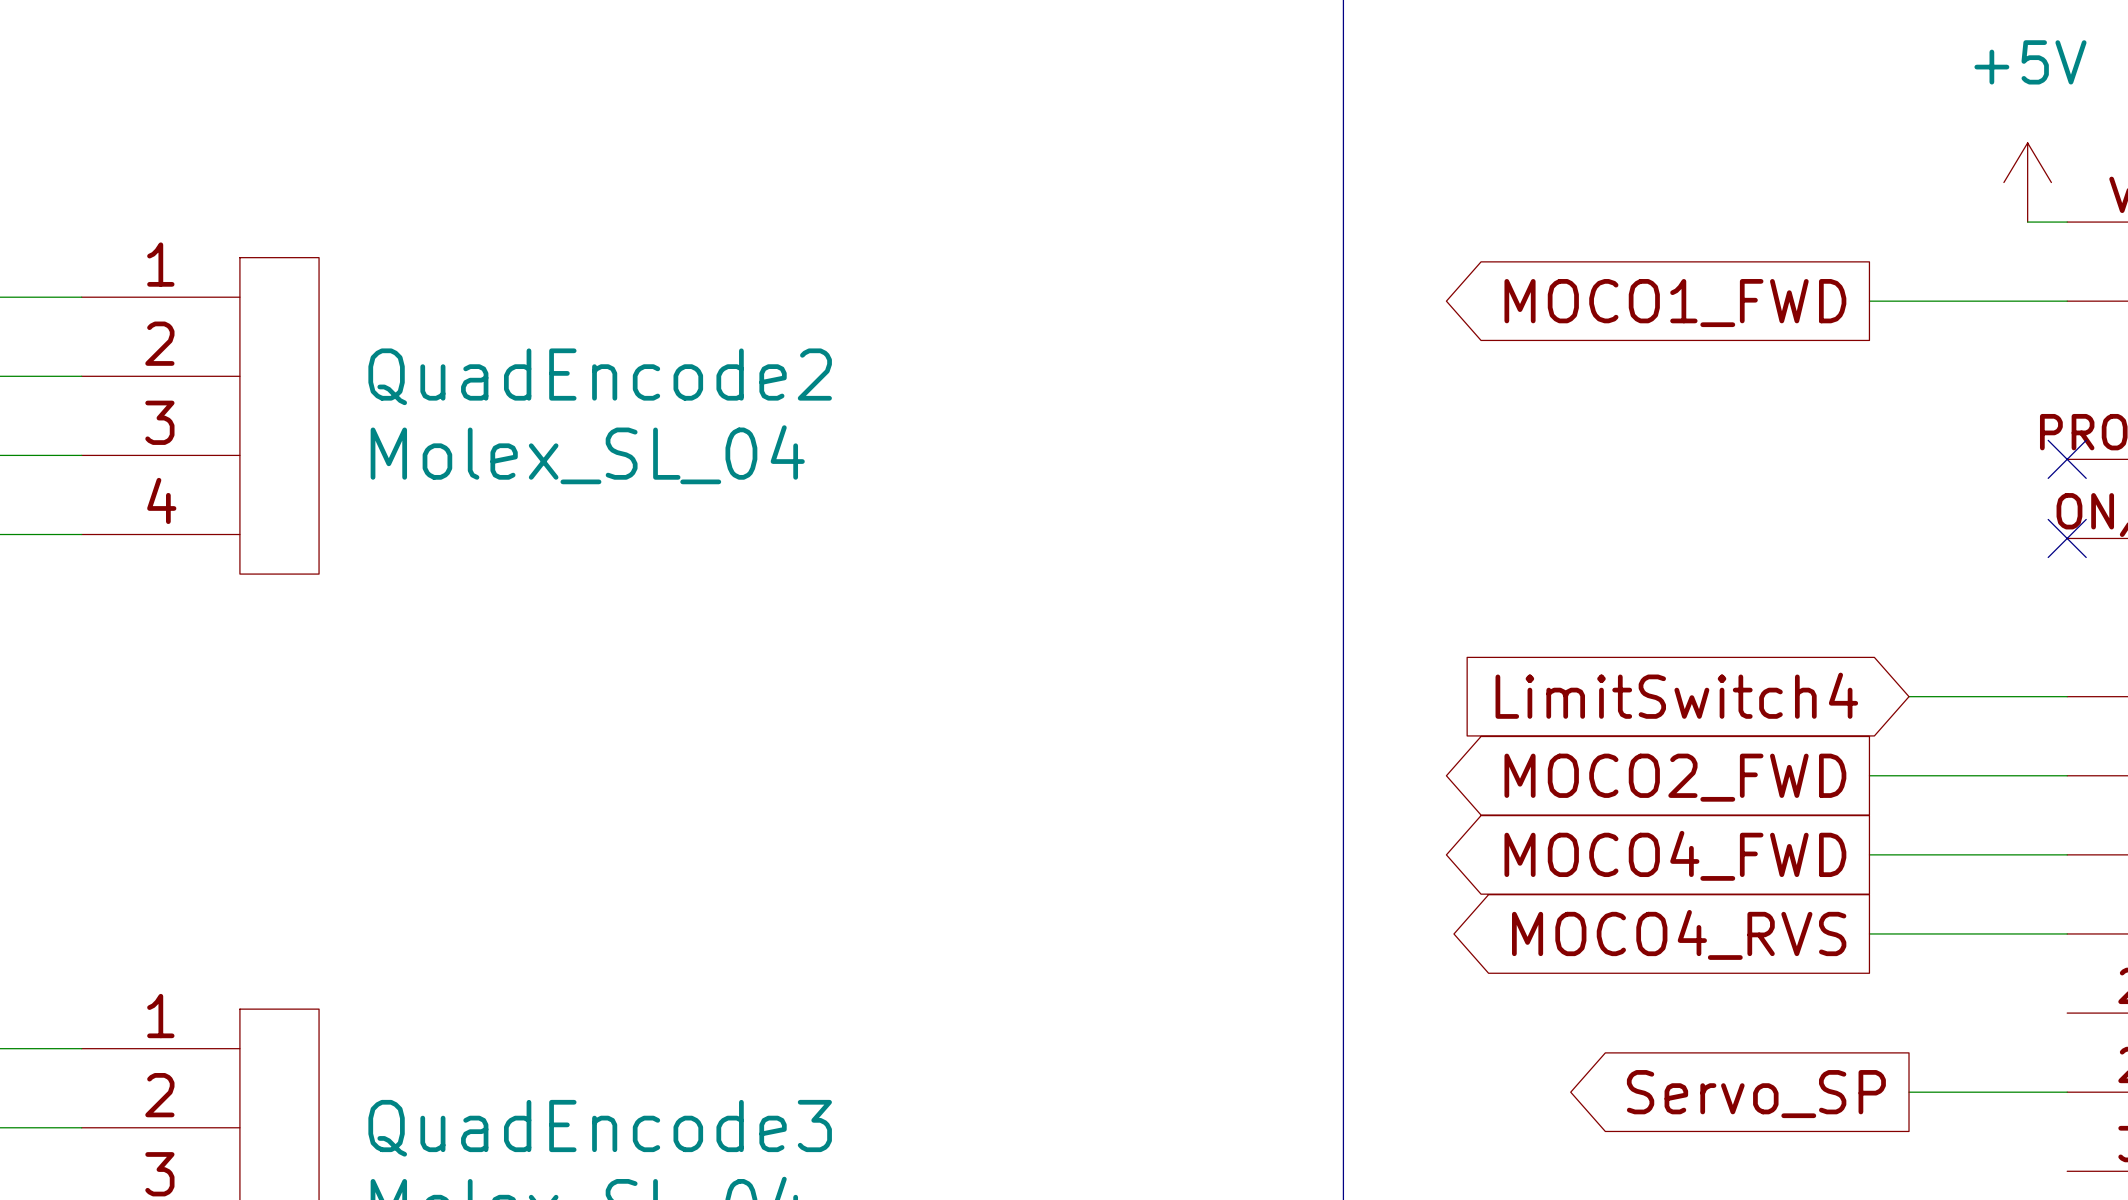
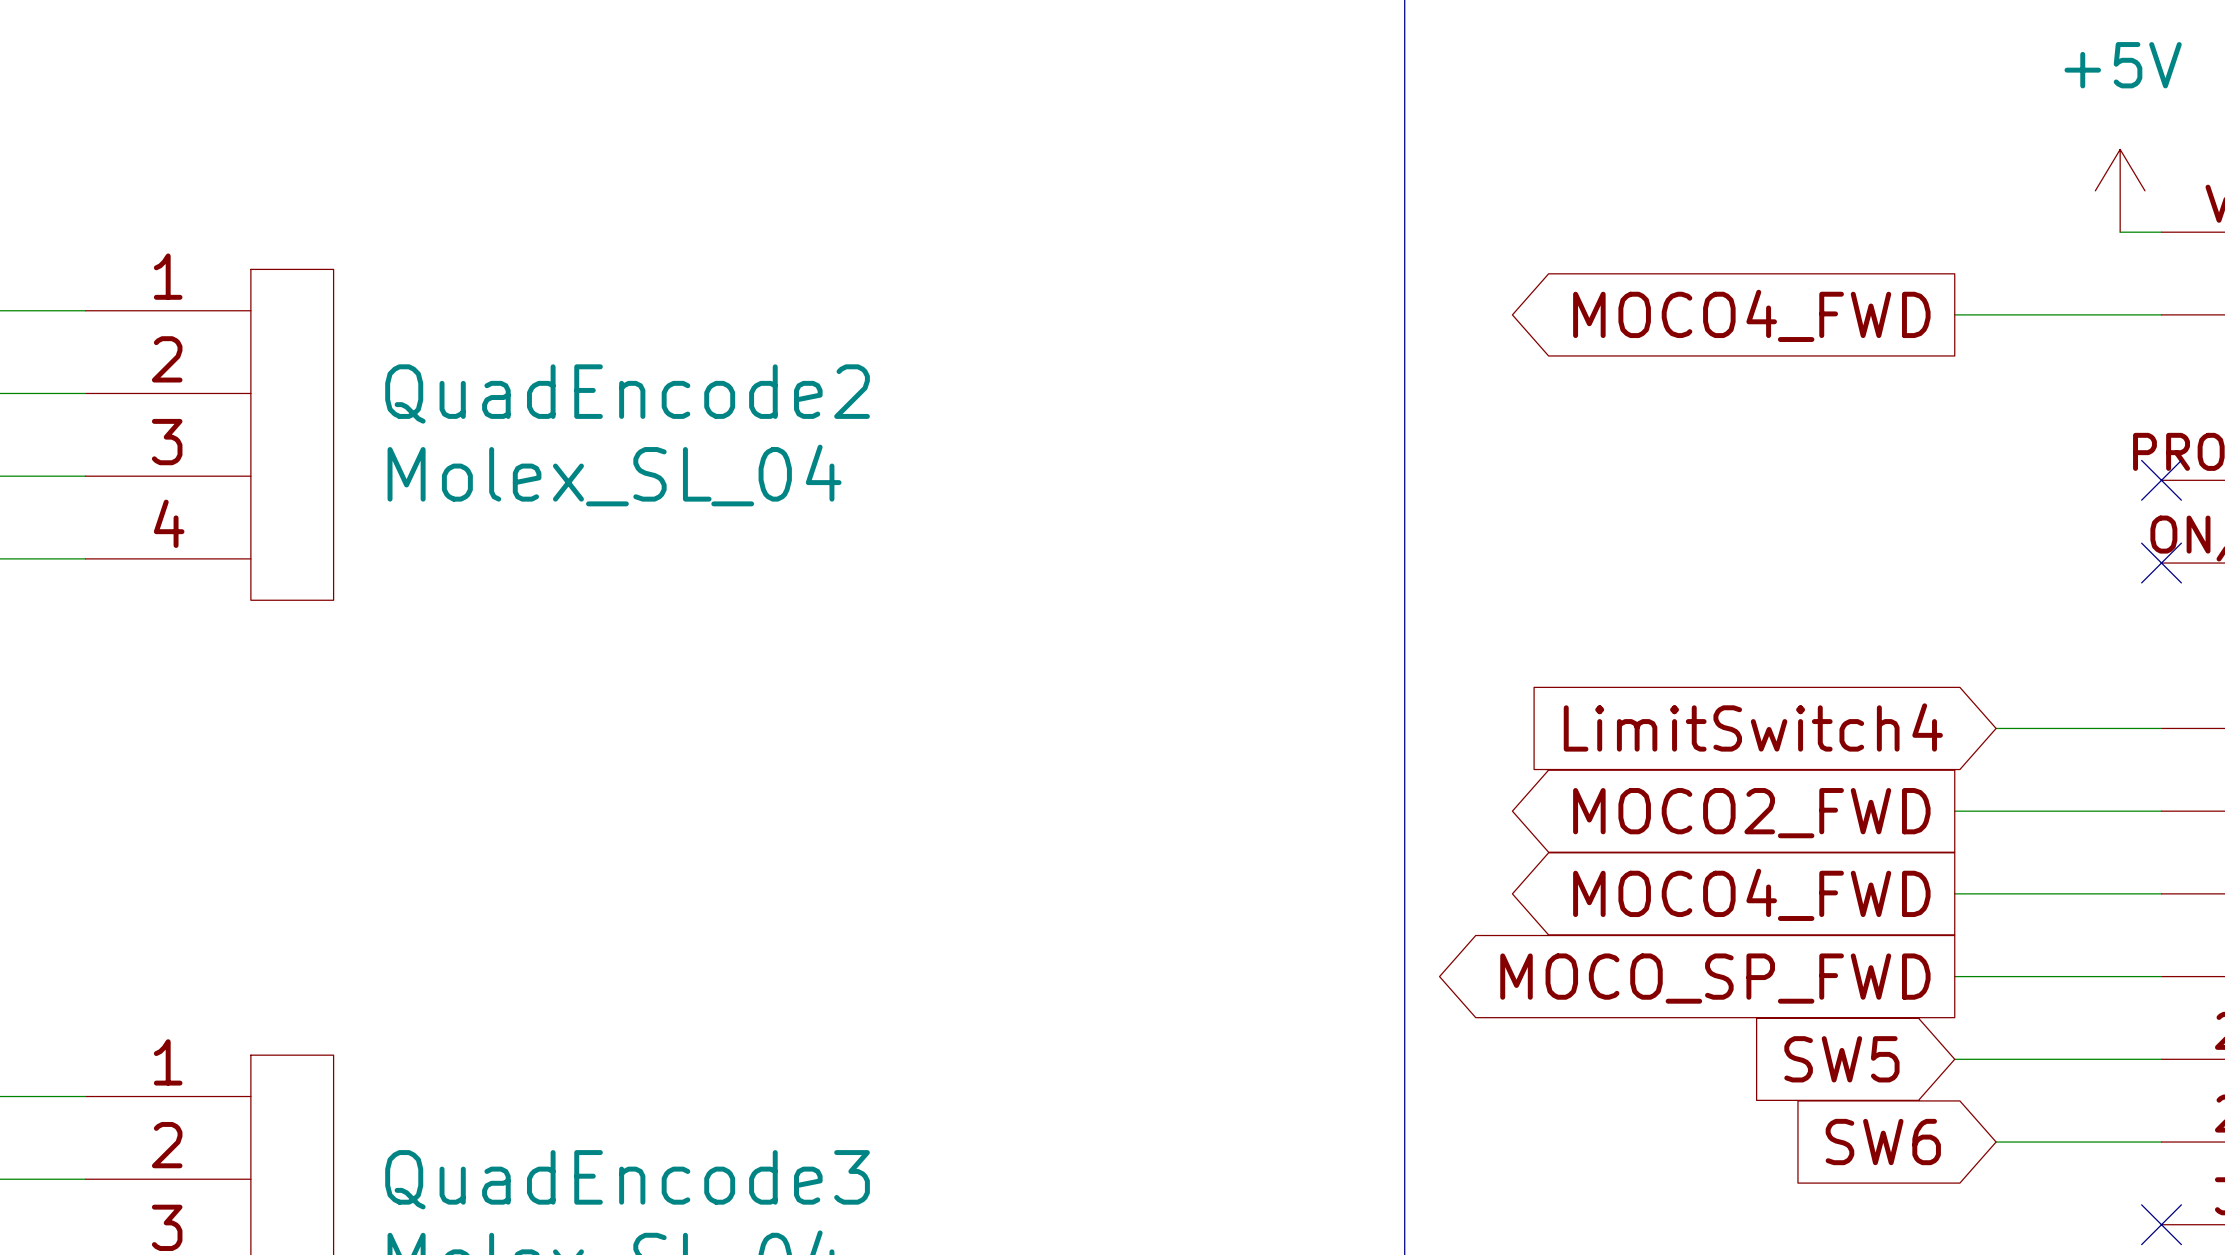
global label: MOCO1_FWD (1675, 303) -> MOCO4_FWD (1751, 315)
global label: MOCO4_RVS (1679, 934) -> MOCO_SP_FWD (1715, 978)
global label: none -> SW5 (1841, 1059)
wire: none -> (1954, 1059) (2161, 1059)
global label shape: output (1756, 1094) -> input (1883, 1142)
global label: Servo_SP (1756, 1094) -> SW6 (1883, 1142)
no-connect mark: none -> (2161, 1224)

